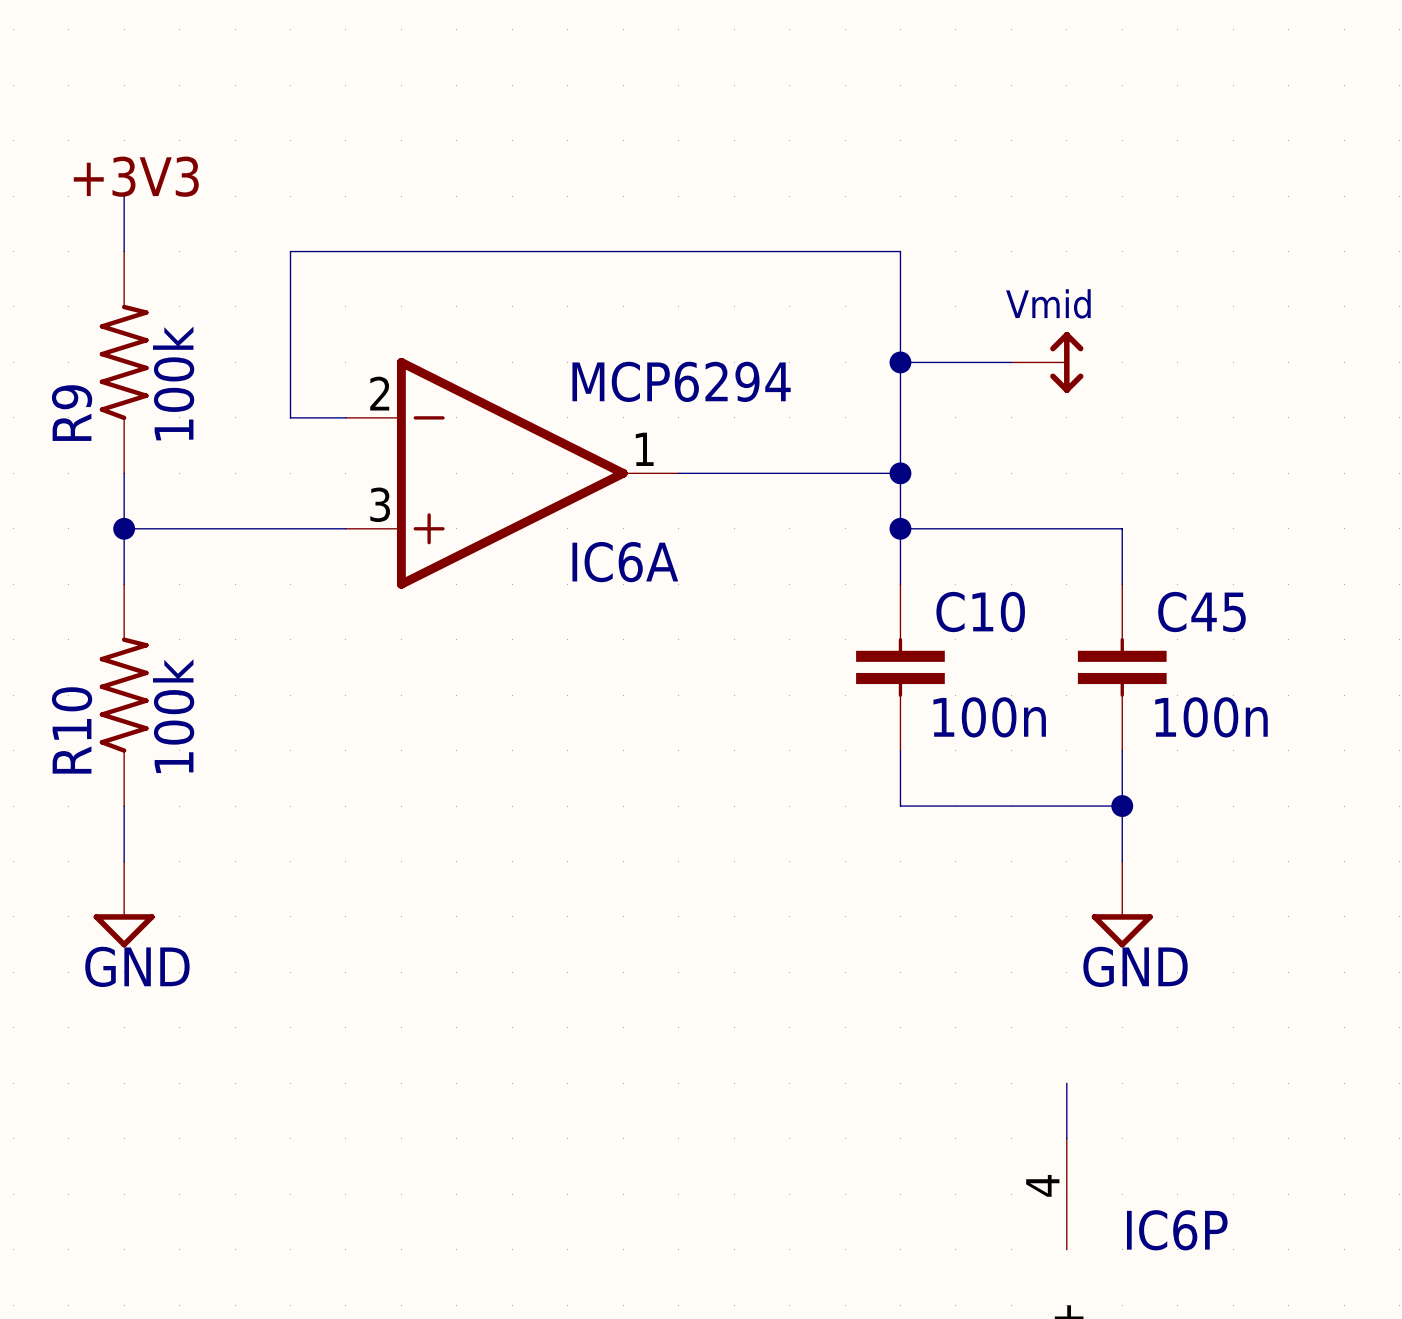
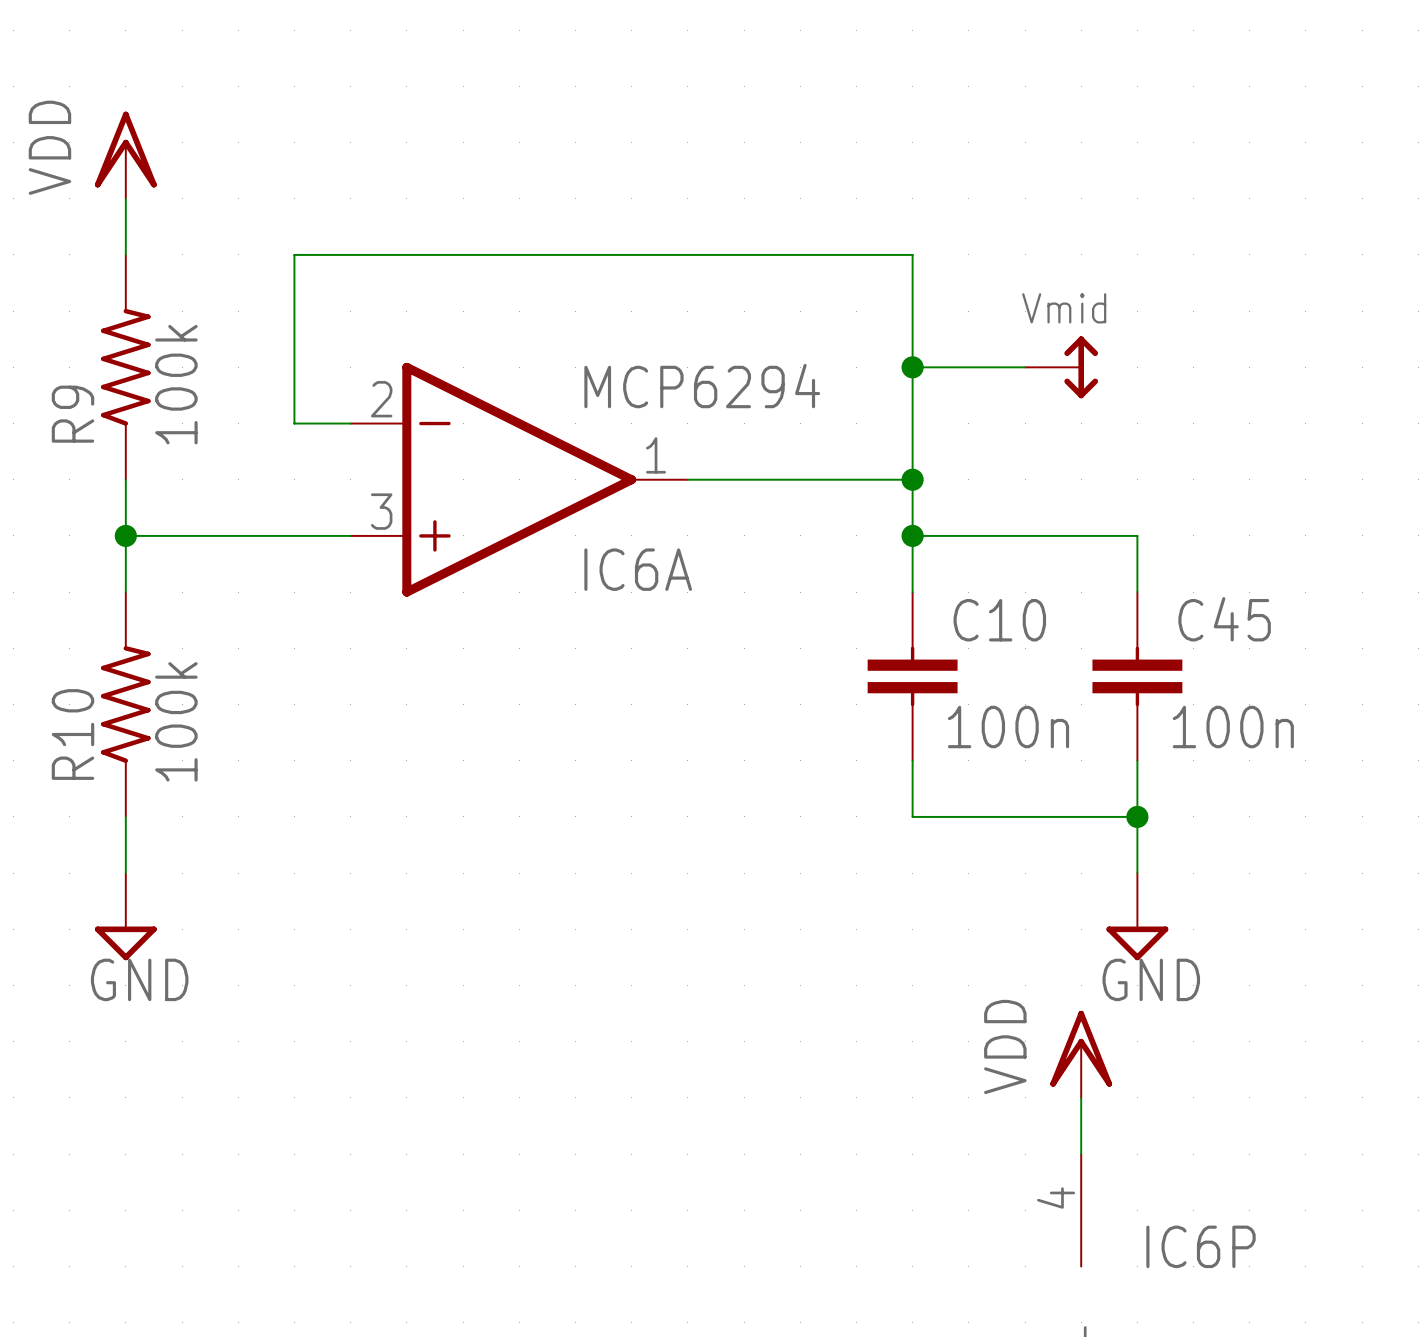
power symbol: none -> VDD (125, 155)
label: +3V3 (136, 176) -> none
power symbol: none -> VDD (1081, 1054)

